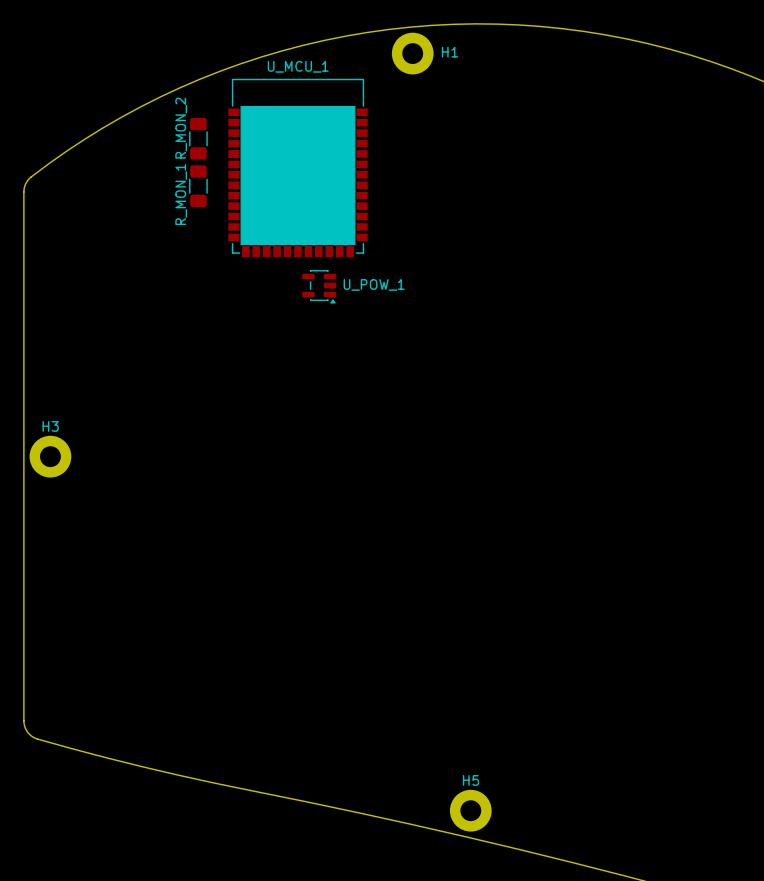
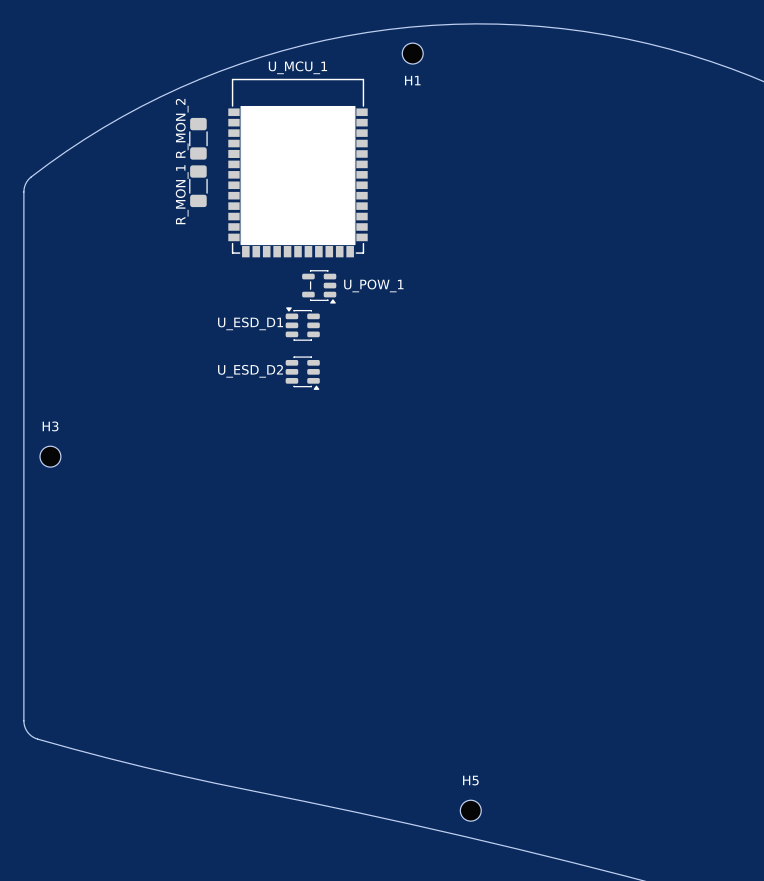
H1 footprint: [391, 32, 434, 75] -> [402, 43, 424, 65]
H1 name position: H1 (449, 52) -> H1 (412, 80)
U_ESD_D1: none -> (302, 324)
U_ESD_D2: none -> (302, 373)
H3 footprint: [29, 435, 72, 478] -> [40, 446, 61, 468]
H5 footprint: [449, 789, 492, 832] -> [460, 800, 482, 822]

